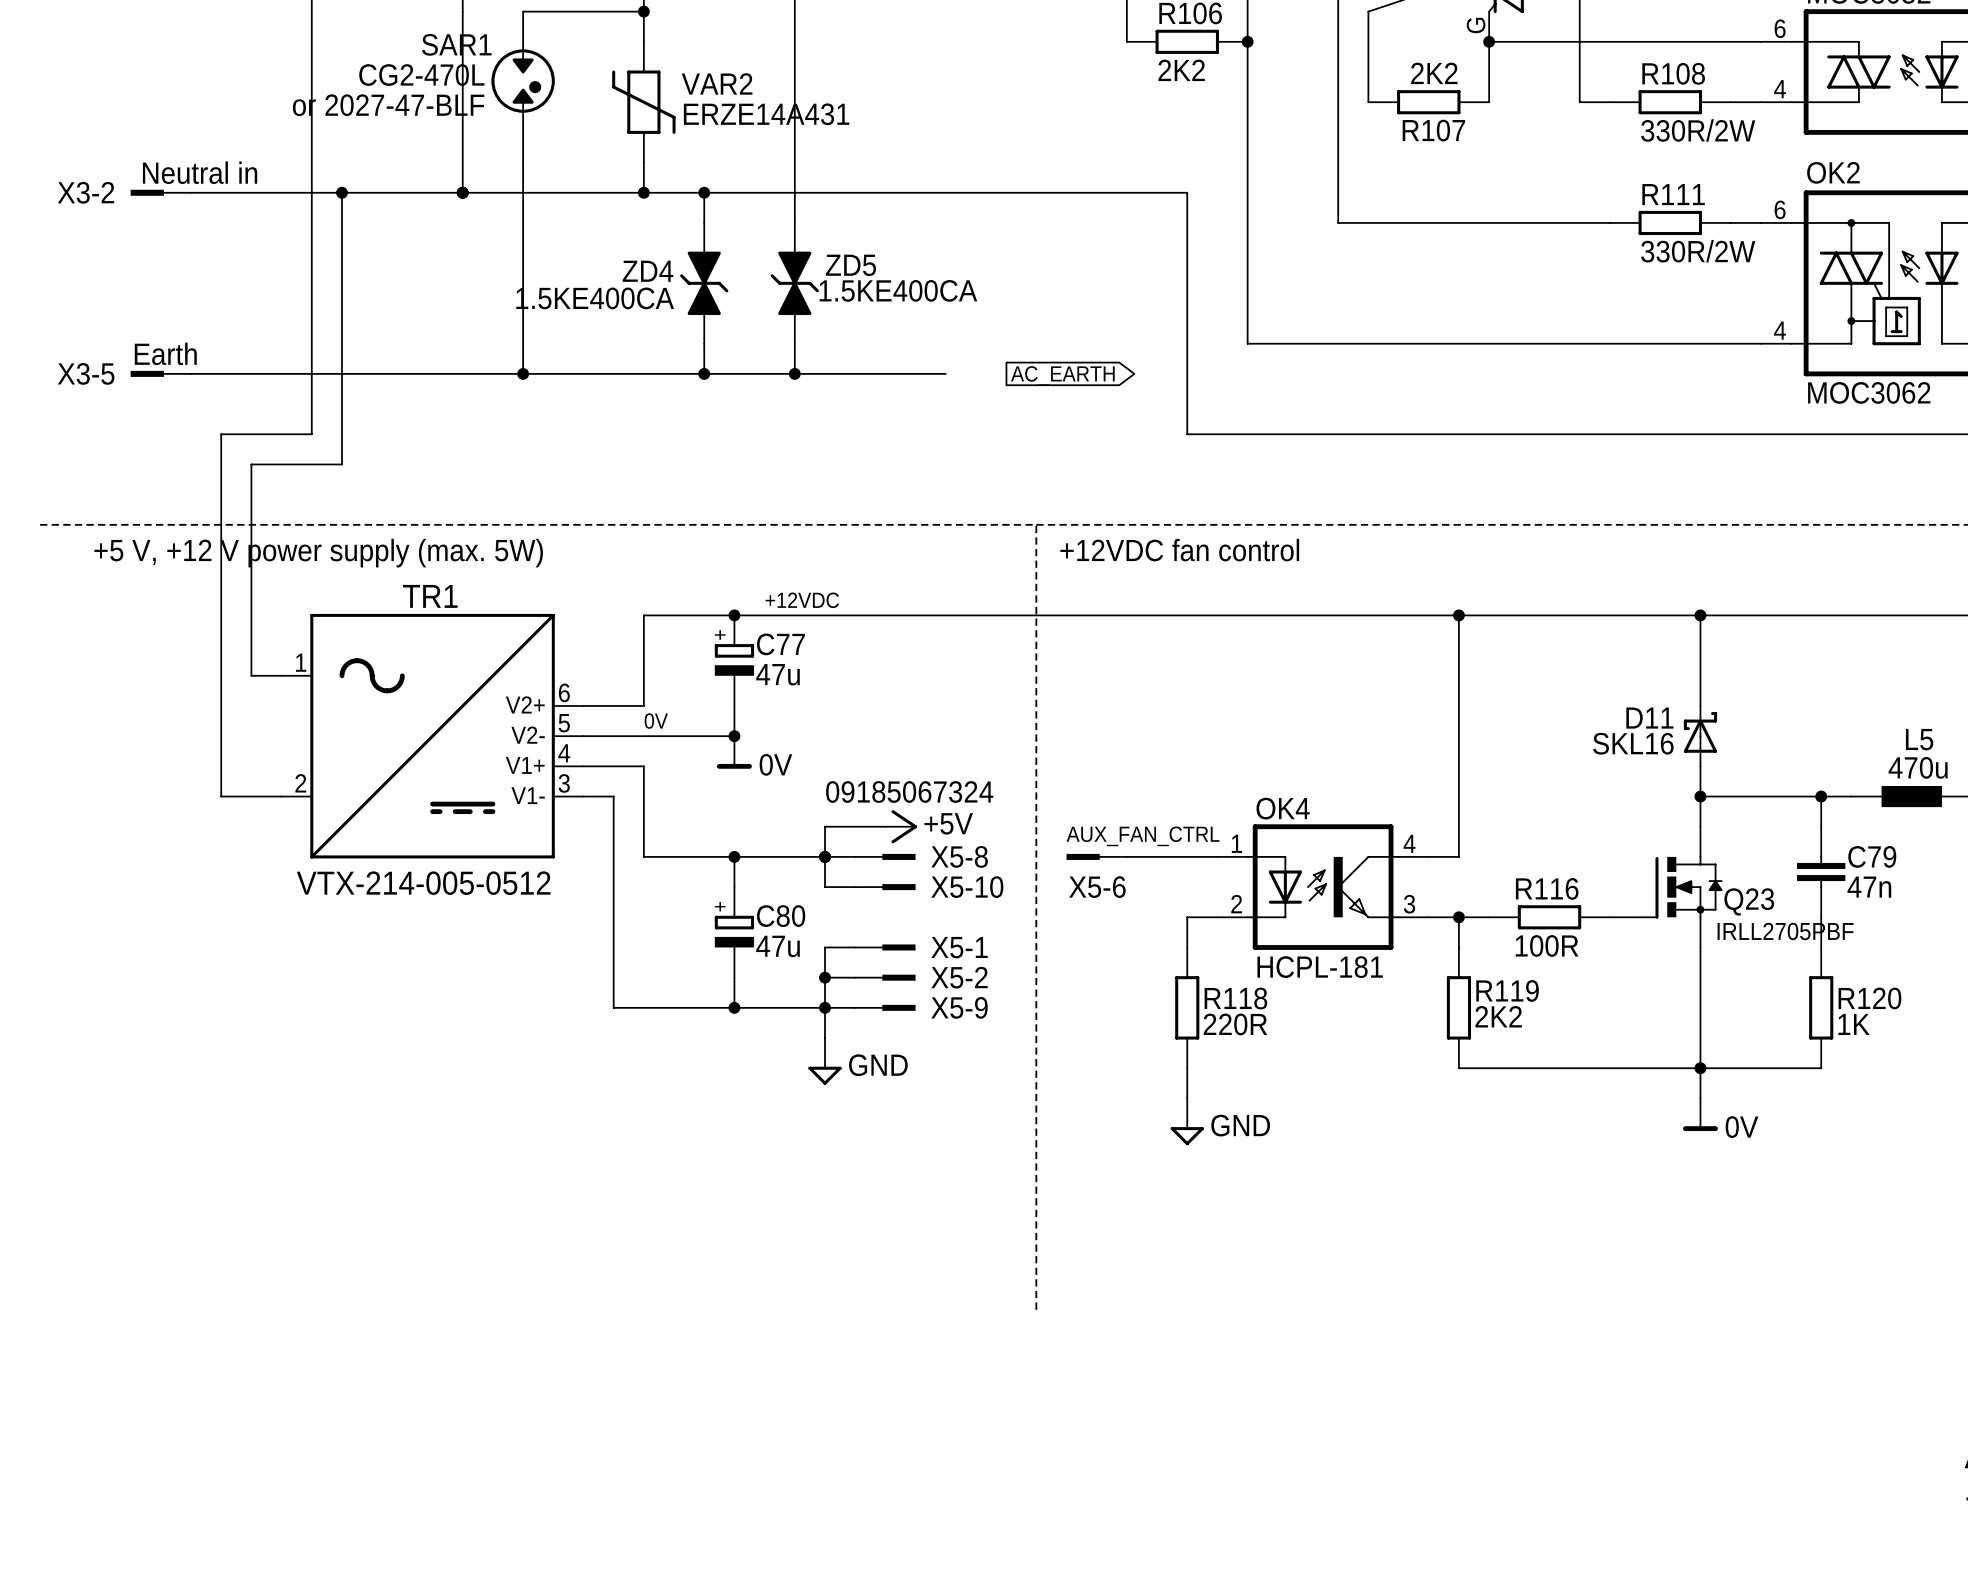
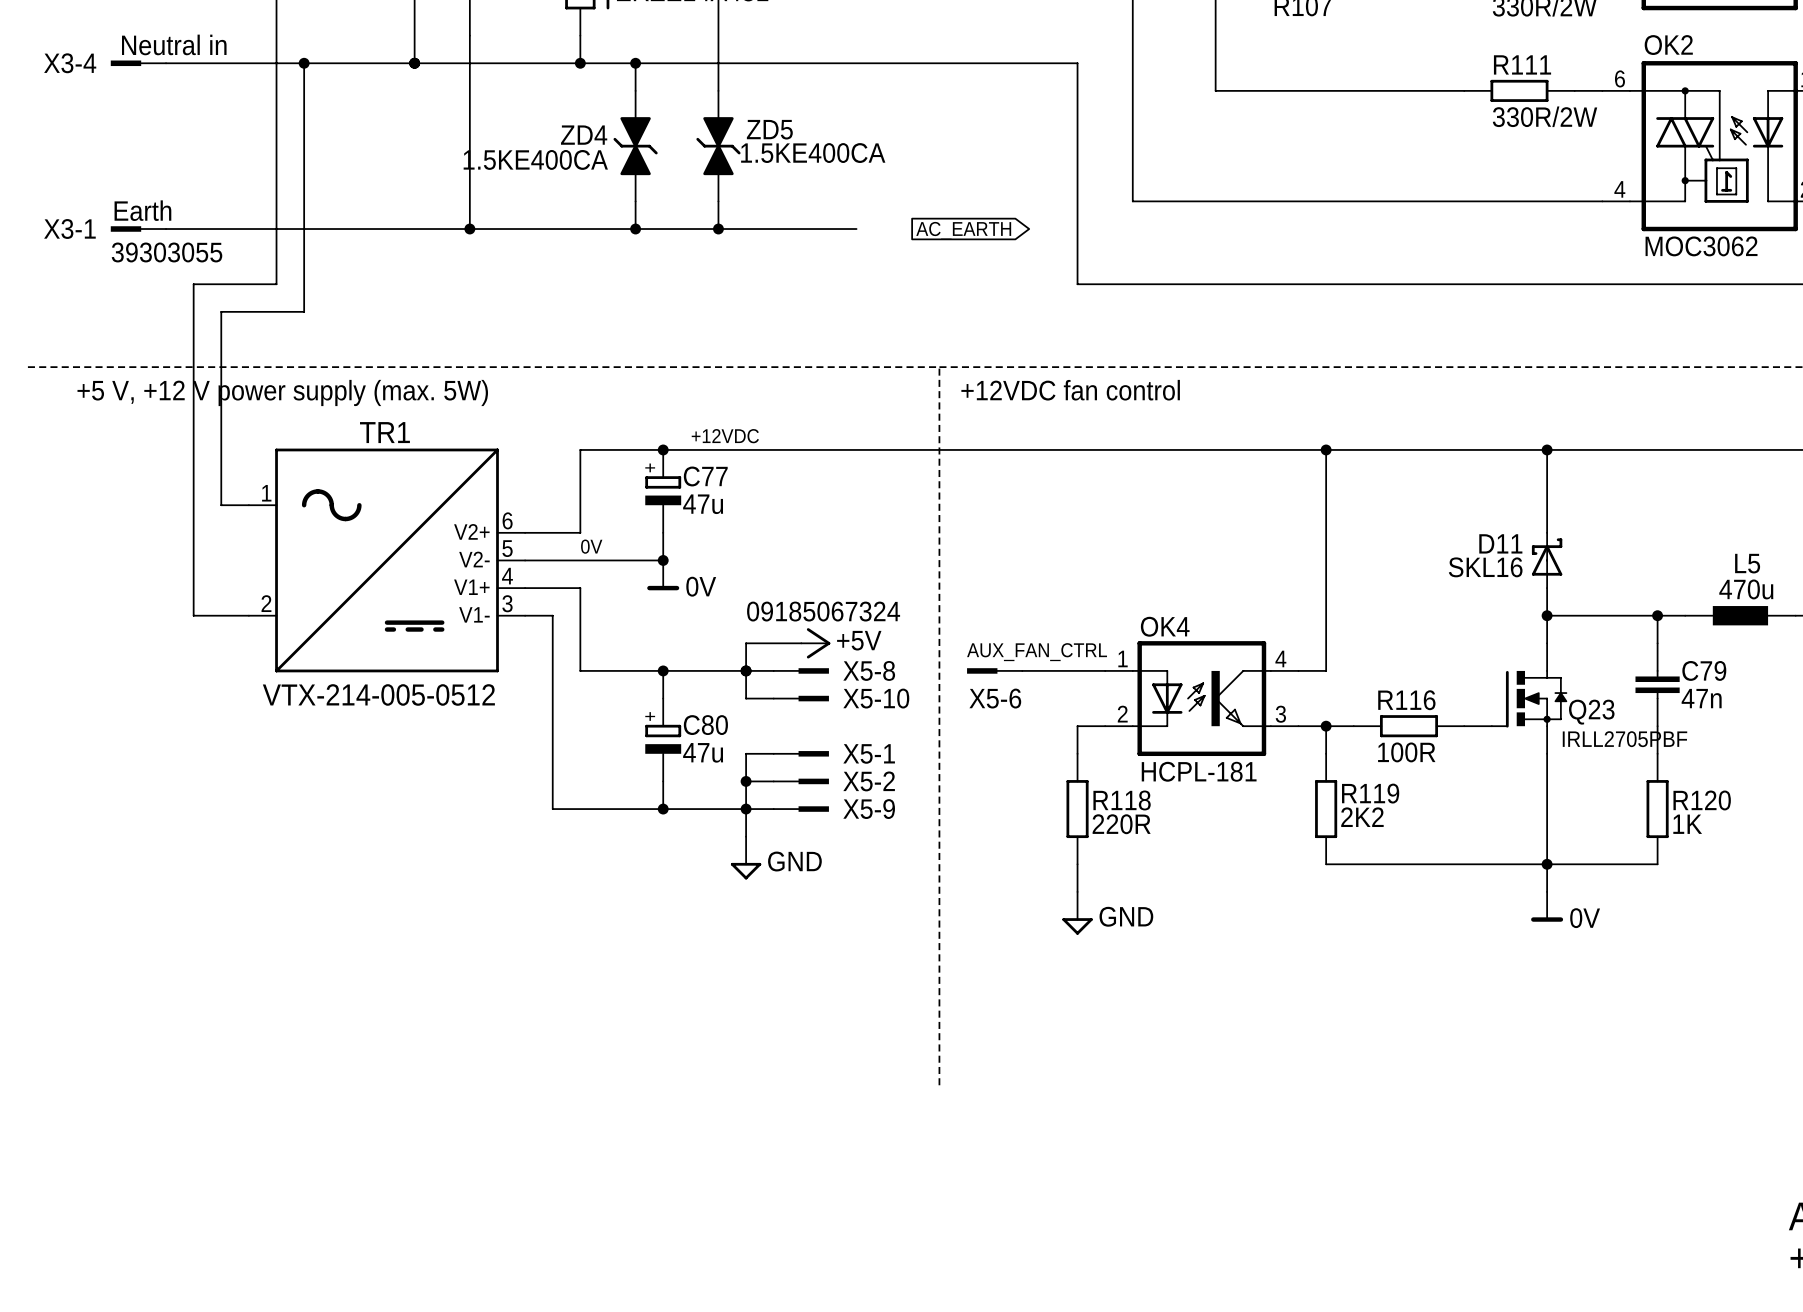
X3-2 name: X3-2 (86, 192) -> X3-4 (70, 63)
X3-5 name: X3-5 (86, 373) -> X3-1 (69, 229)
X3-5 value: none -> 39303055 (167, 252)

